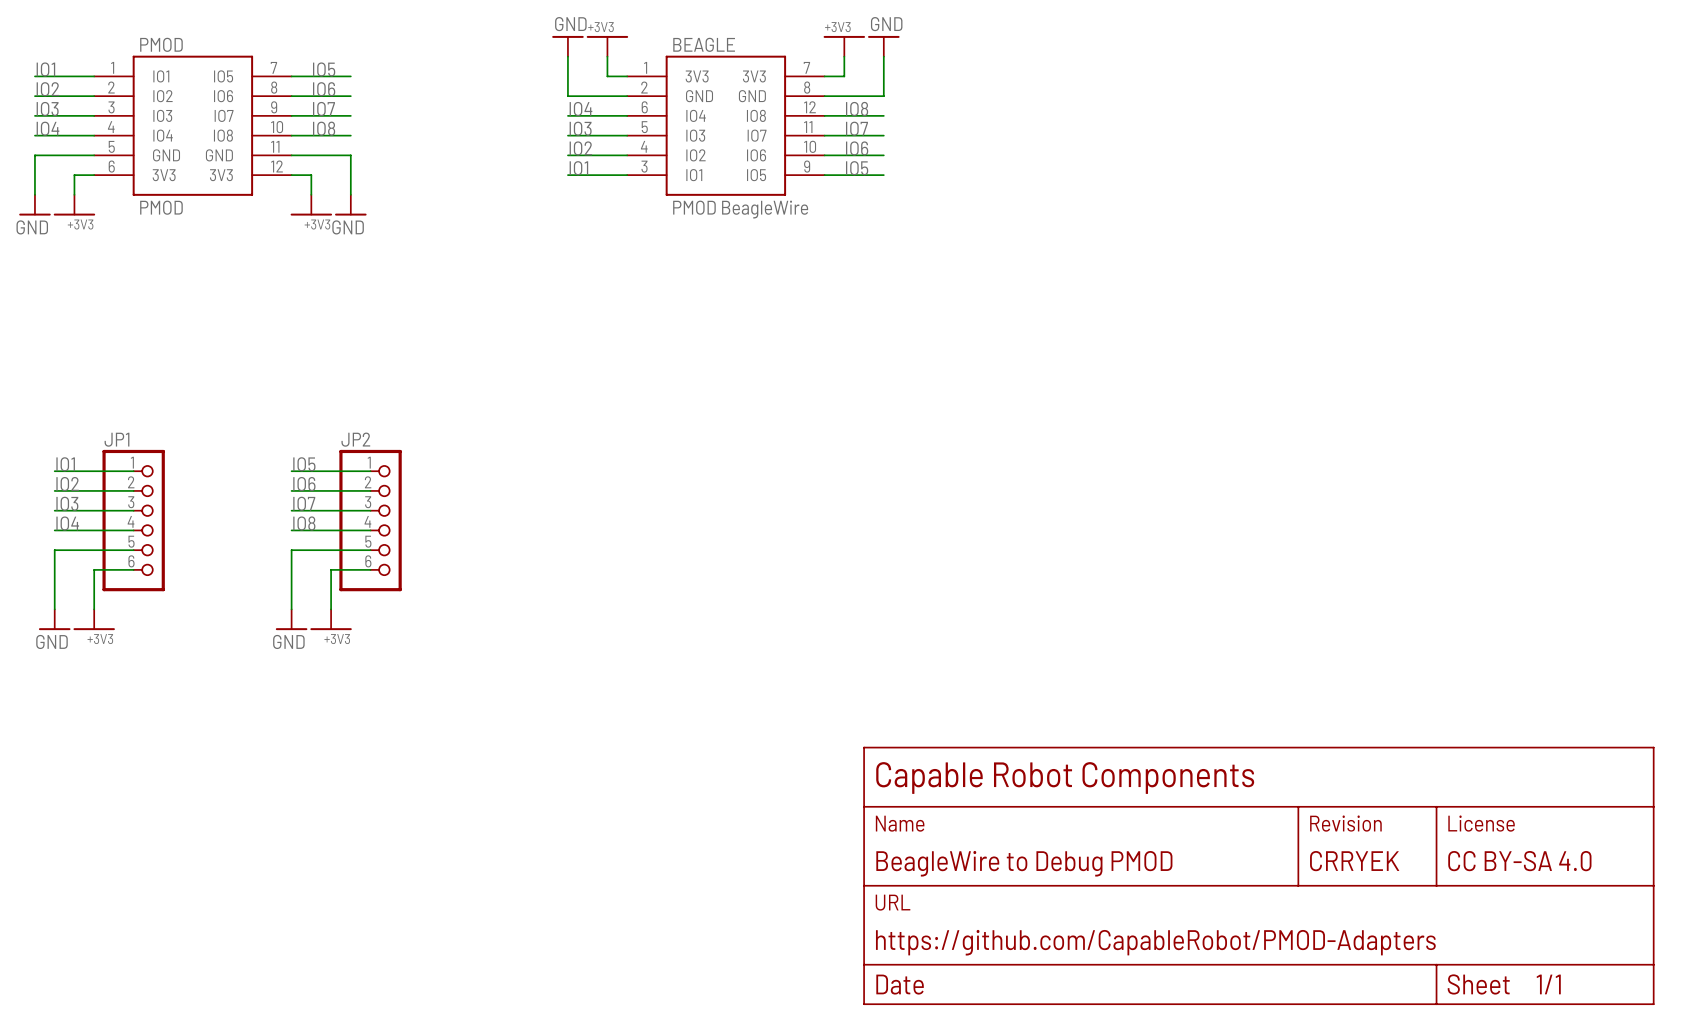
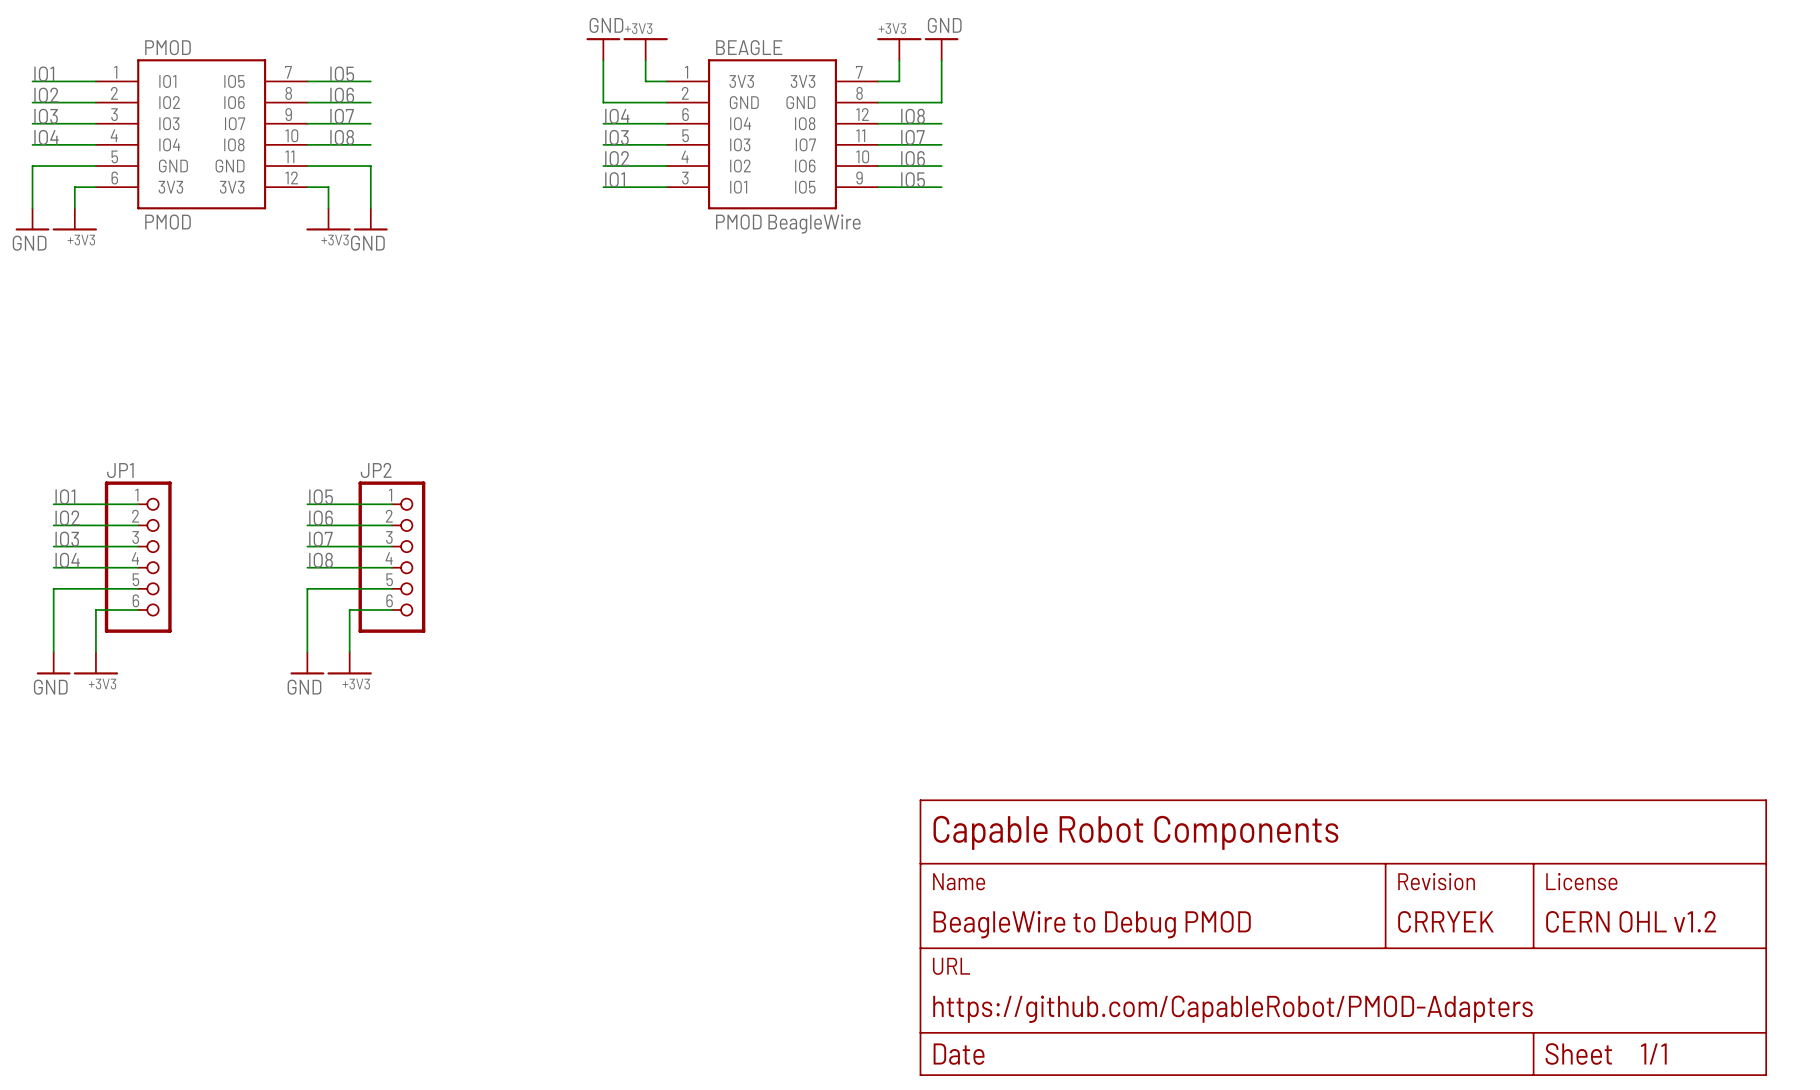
part text: CC BY-SA 4.0 (1519, 861) -> CERN OHL v1.2 (1631, 921)

